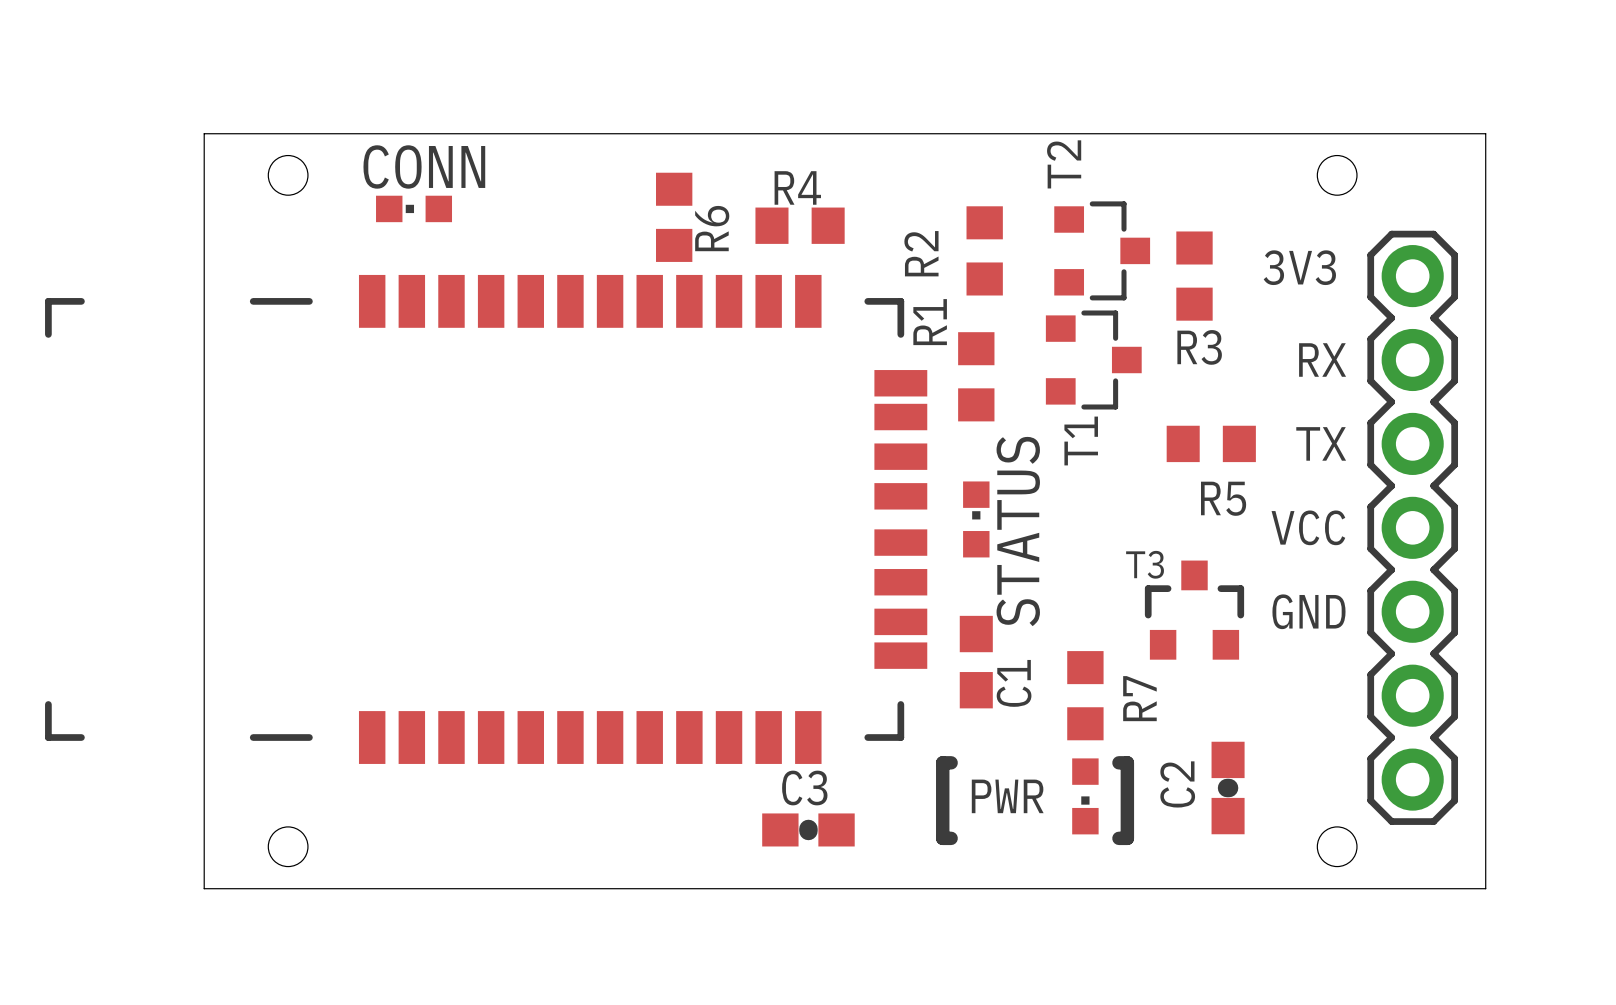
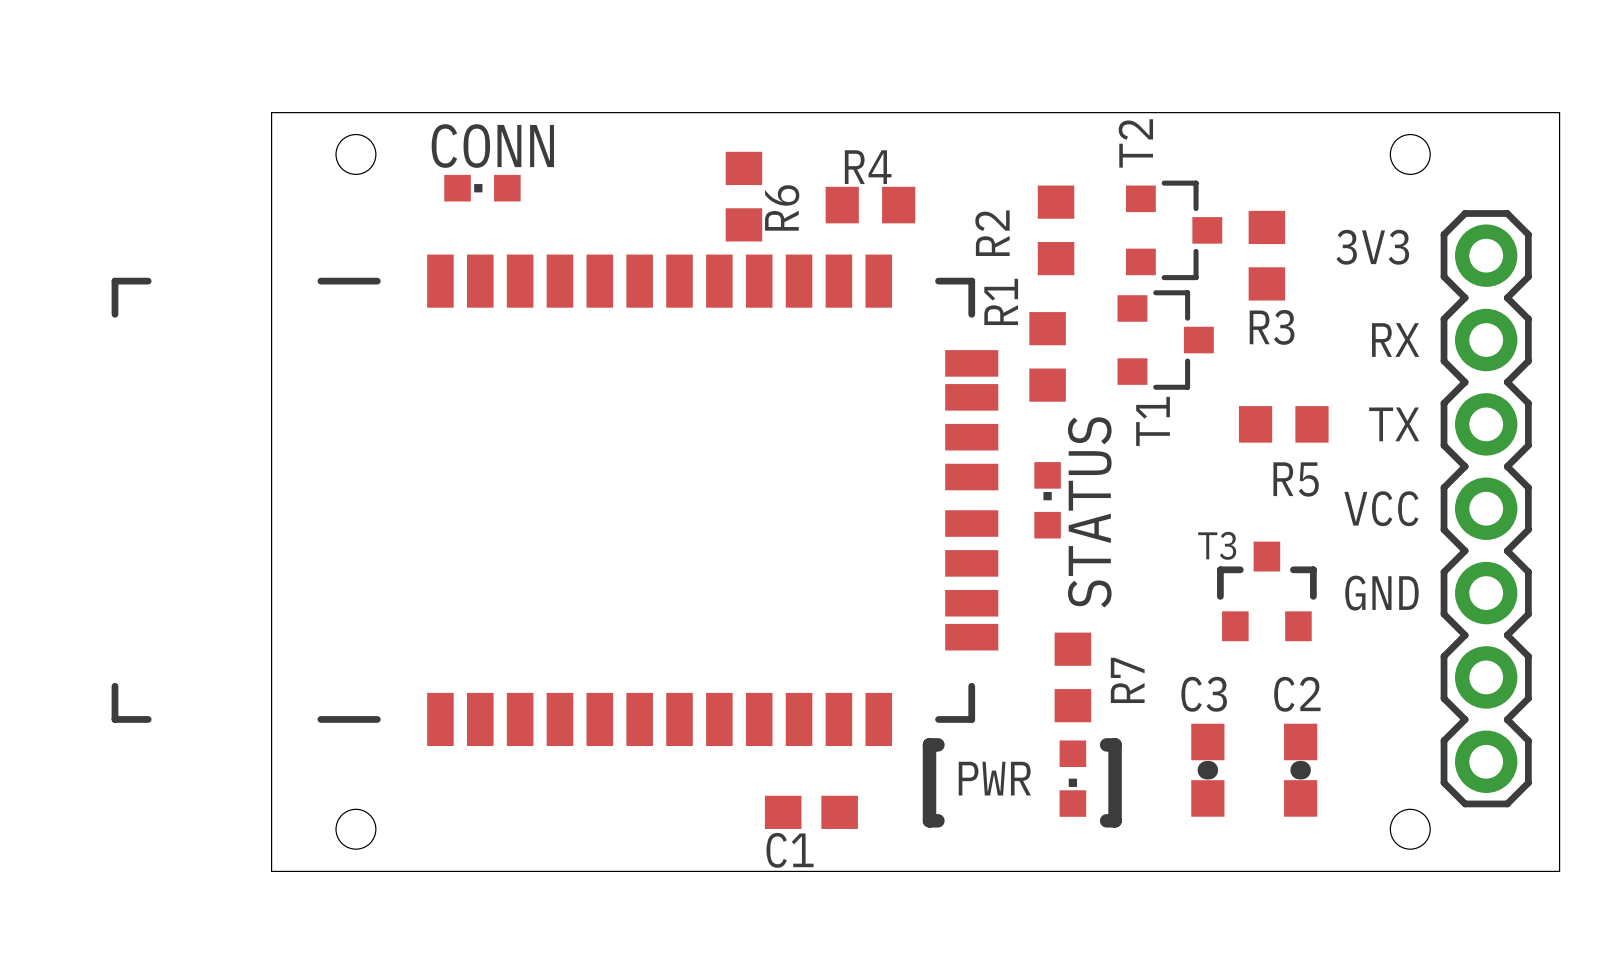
C1 rotation: 0° (976, 662) -> 90° clockwise (811, 812)
C1 position: (976, 662) -> (811, 812)
R7 position: (1085, 695) -> (1072, 677)
line: (951, 762) (942, 762) (942, 838) (951, 838) -> (937, 744) (929, 744) (929, 820) (937, 820)
line: (1118, 762) (1127, 762) (1127, 838) (1118, 838) -> (1106, 744) (1115, 744) (1115, 820) (1106, 820)
C2 name rotation: 0° (1177, 784) -> 90° clockwise (1297, 694)
C2 name position: C2 (1177, 784) -> C2 (1297, 694)
text position: PWR (1007, 796) -> PWR (994, 778)
part position: (1085, 796) -> (1072, 778)
C3 rotation: 0° (808, 829) -> 90° clockwise (1207, 770)
C3 position: (808, 829) -> (1207, 770)

